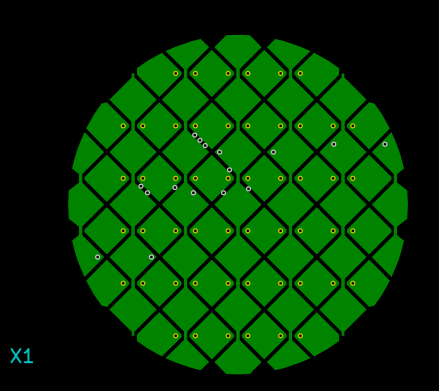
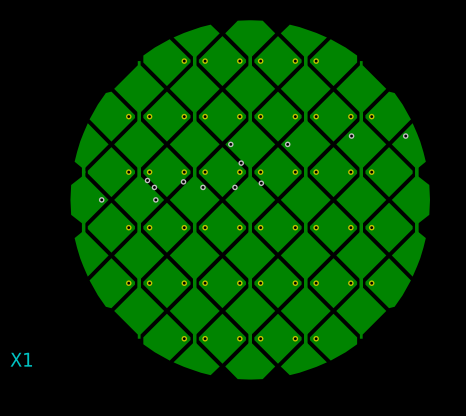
via: (194, 135) -> none
via: (199, 140) -> none
via: (205, 145) -> none
via: none -> (101, 199)
via: none -> (155, 199)
via: (97, 257) -> none
via: (151, 257) -> none

